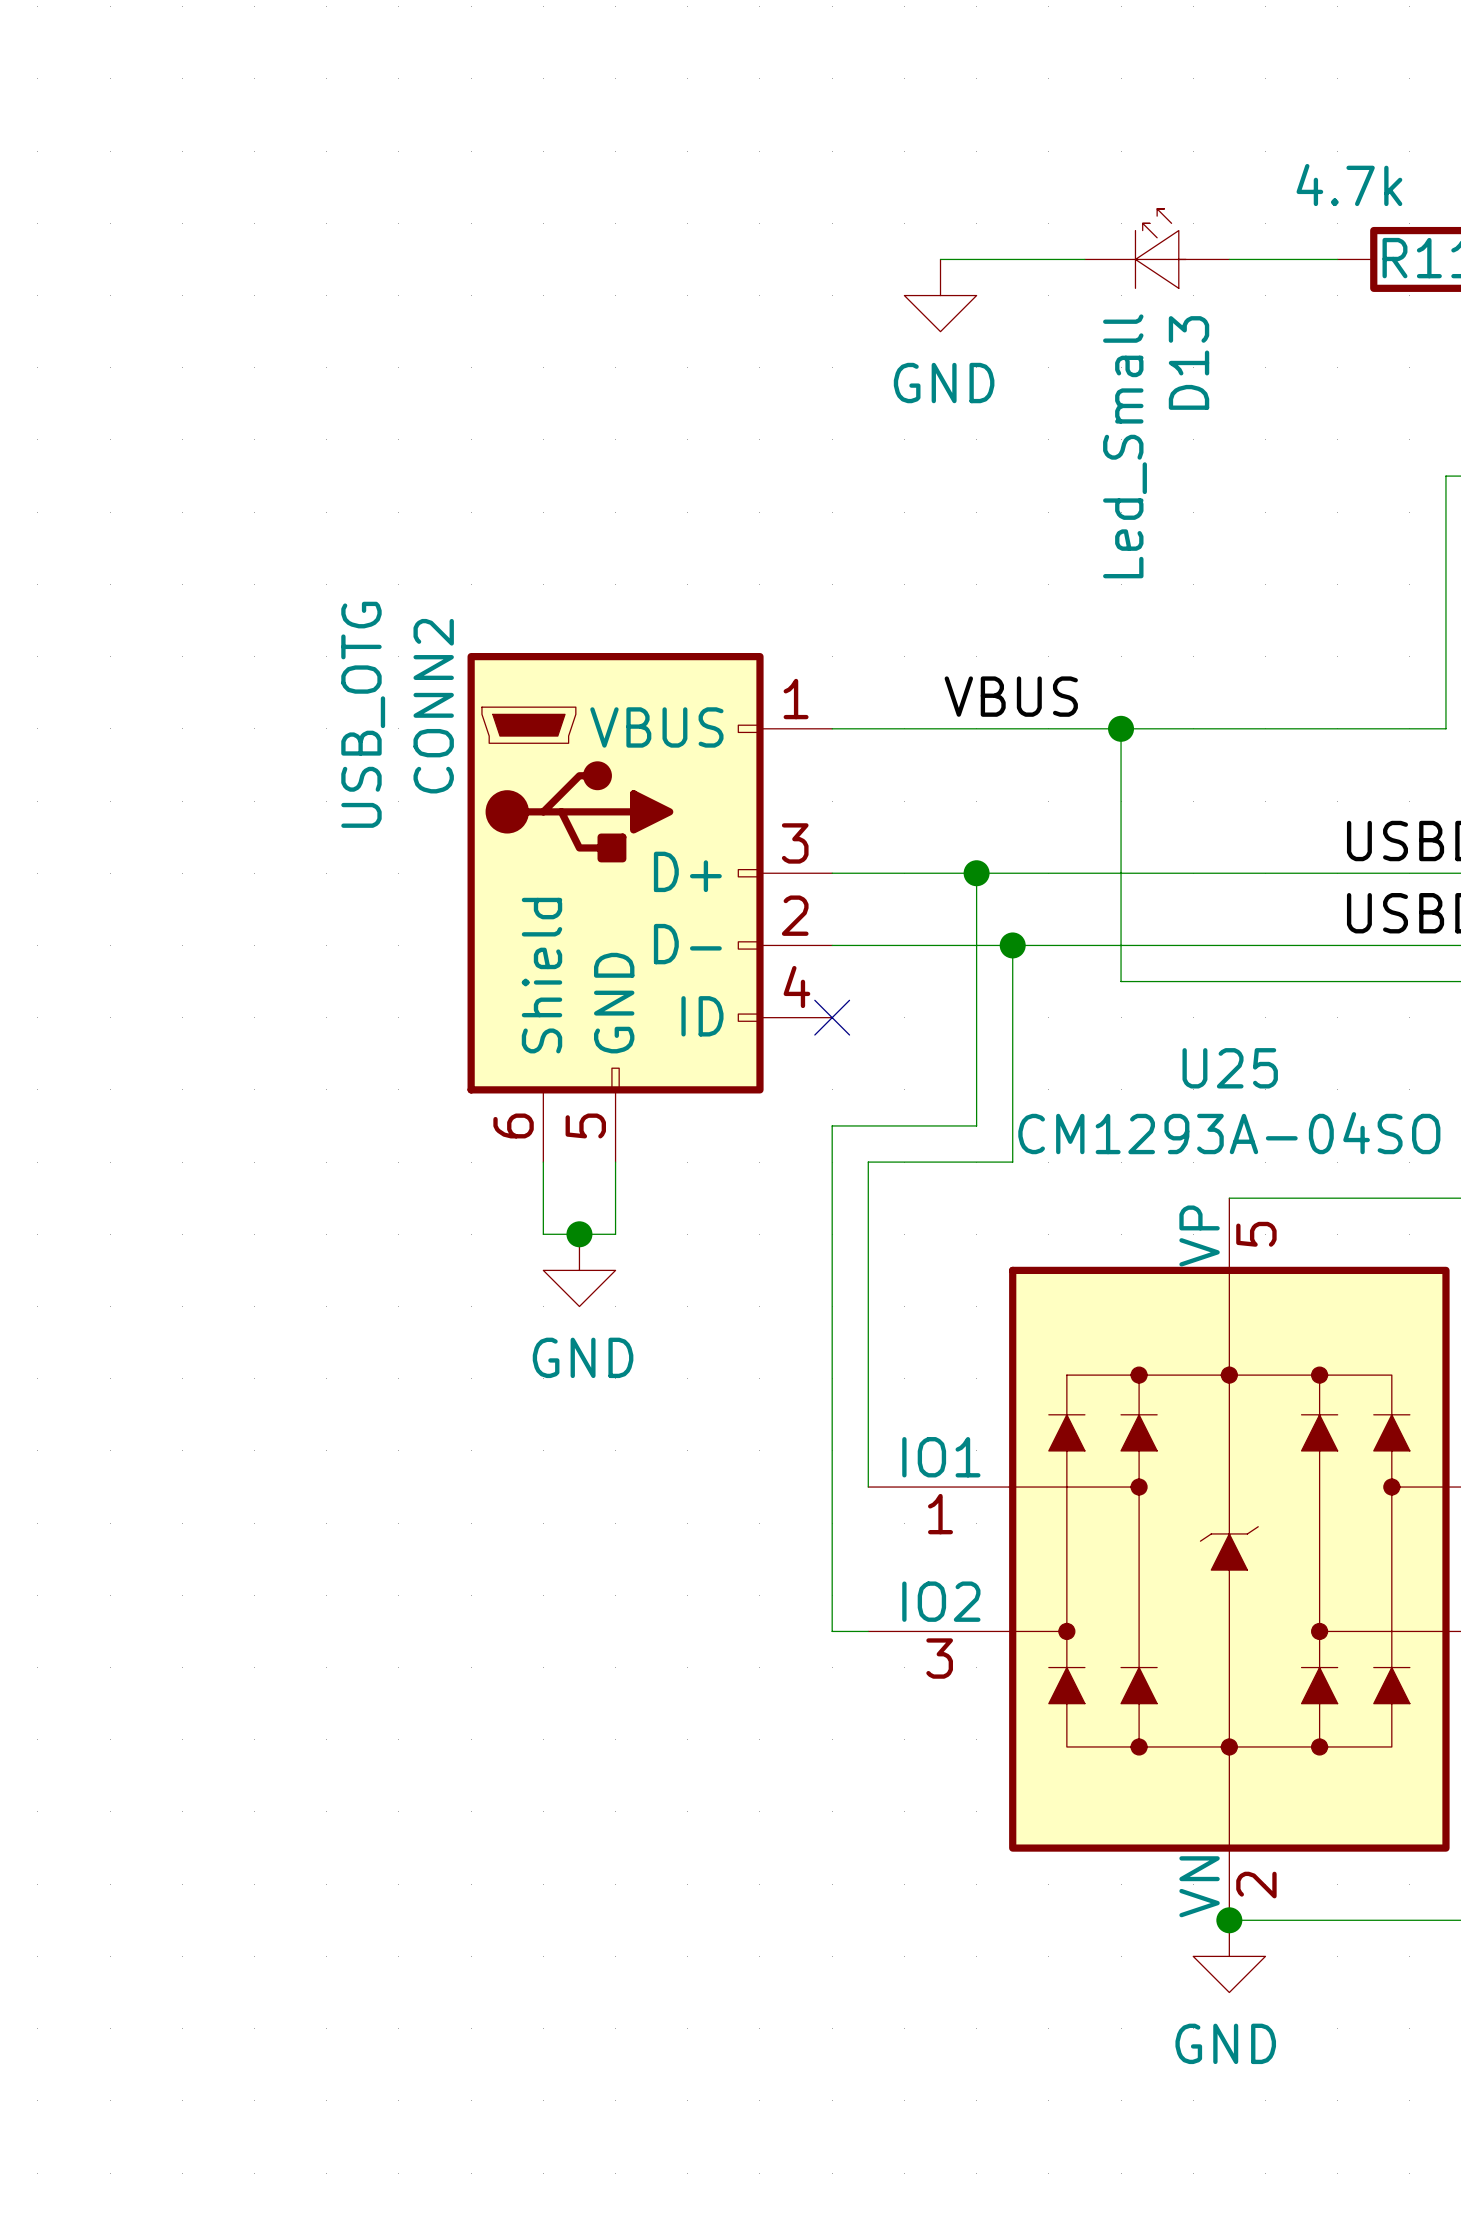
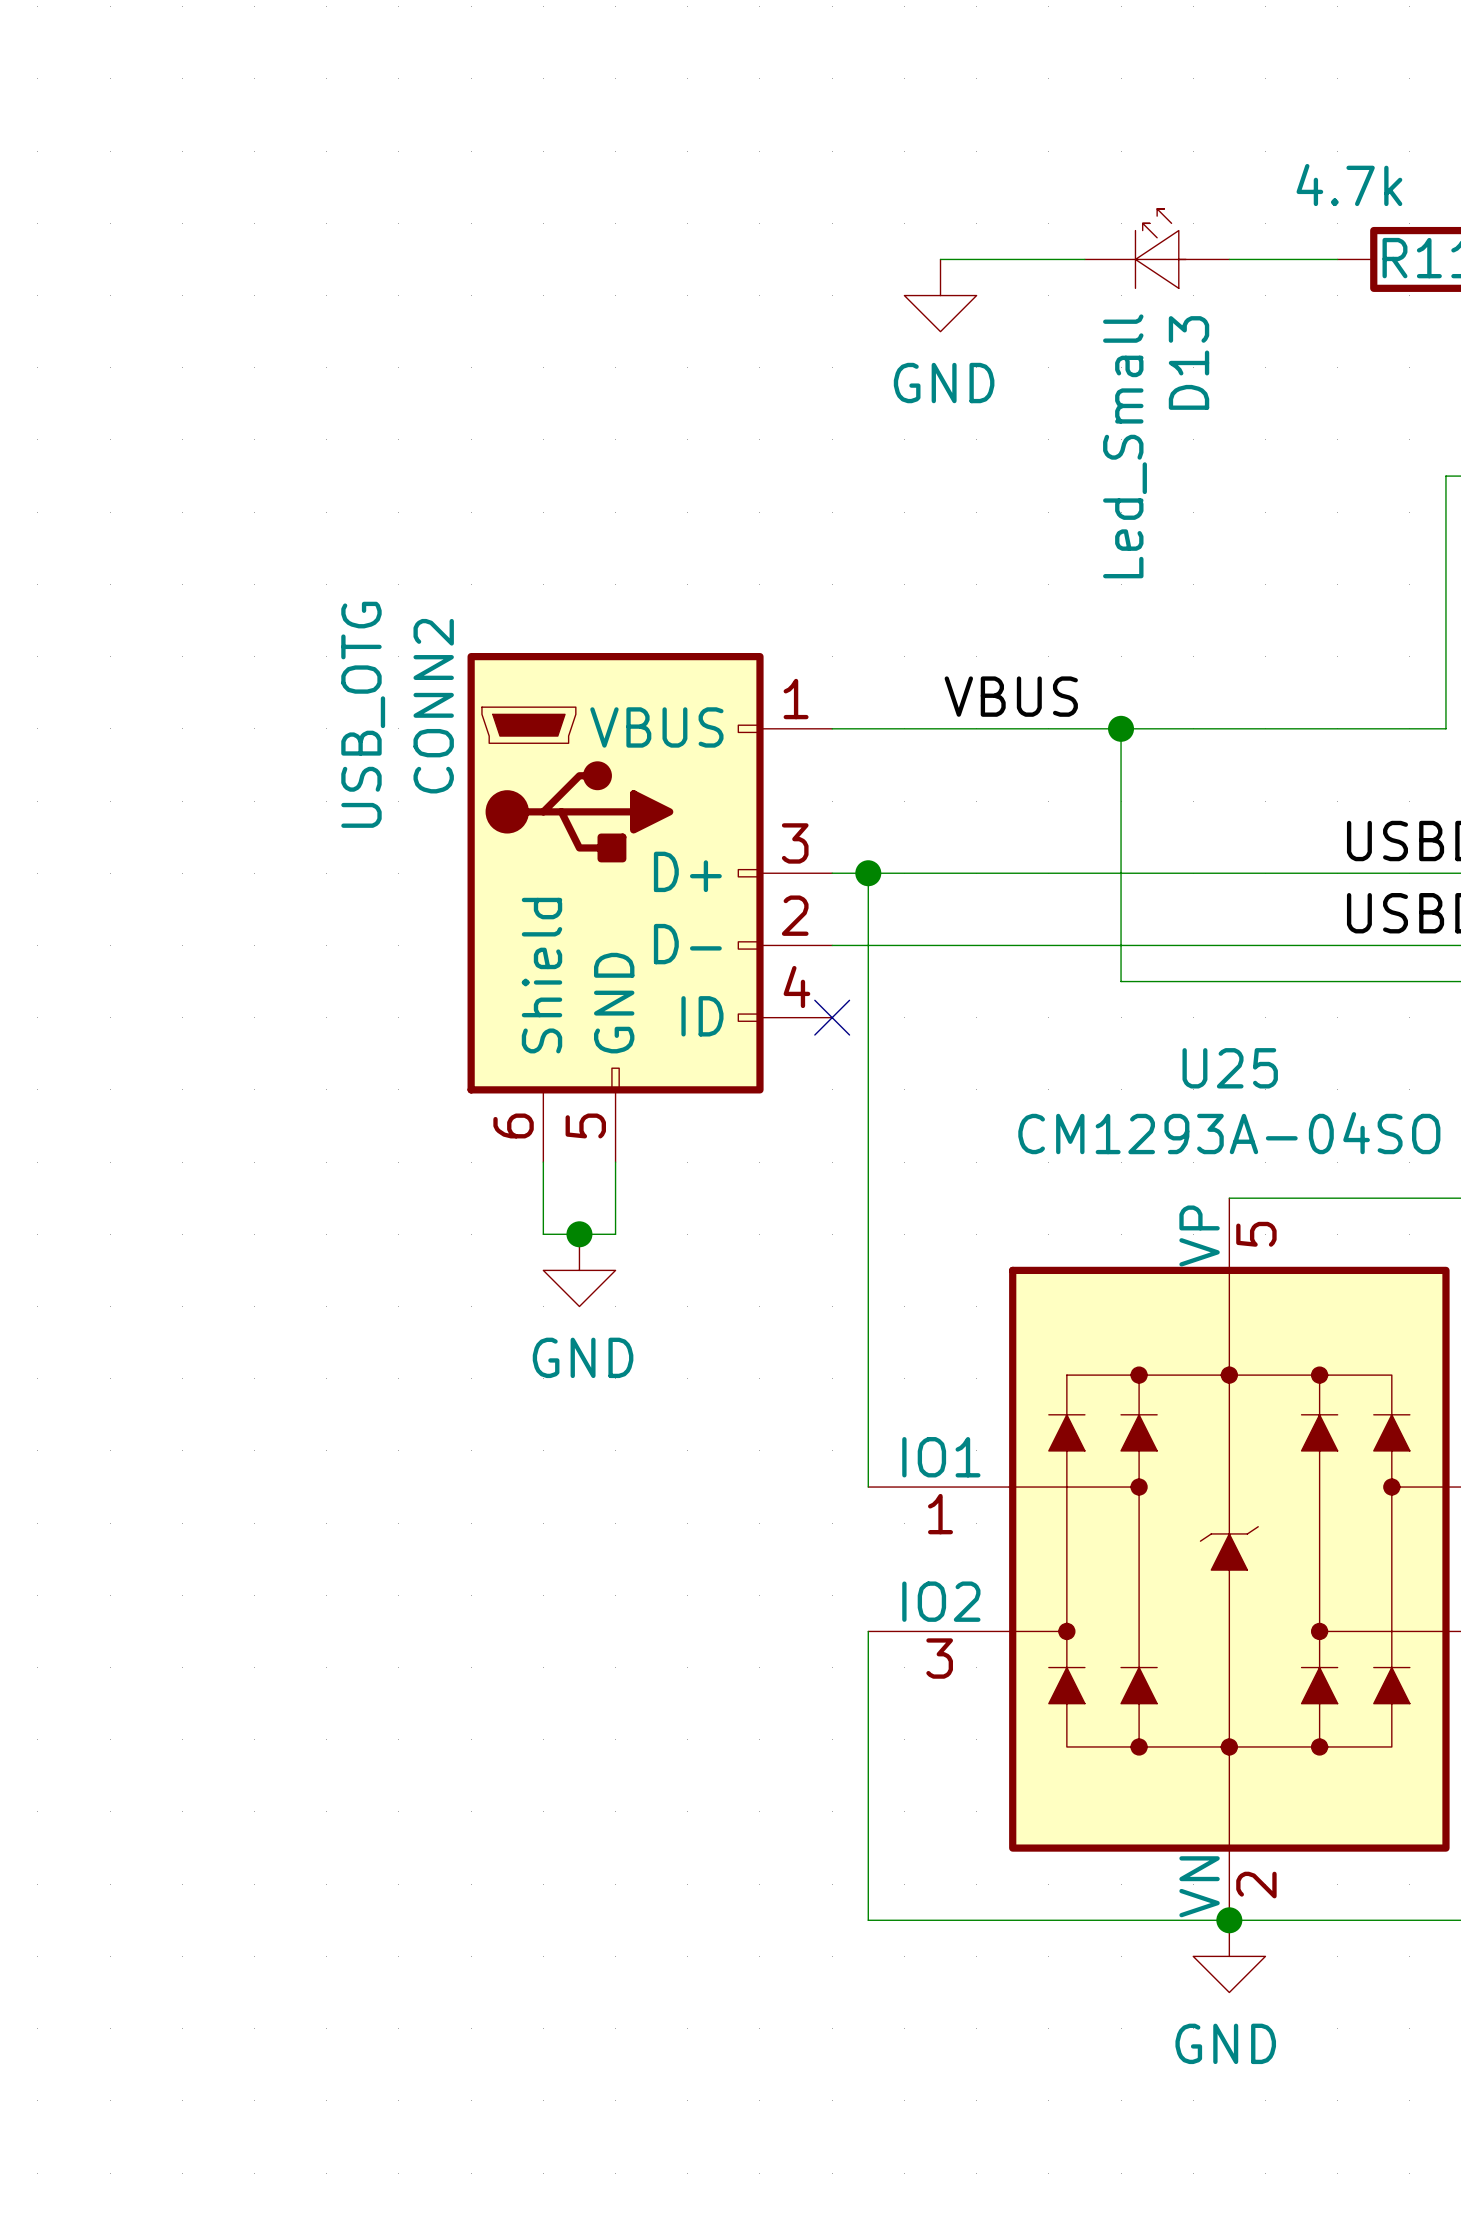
junction: none -> (868, 873)
wire: (976, 873) (976, 1125) (832, 1125) (832, 1631) (868, 1631) -> (1229, 1920) (868, 1920) (868, 1631)
junction: (976, 873) -> none
wire: (1012, 945) (1012, 1162) (868, 1162) -> (868, 873) (868, 1162)
junction: (1012, 945) -> none

